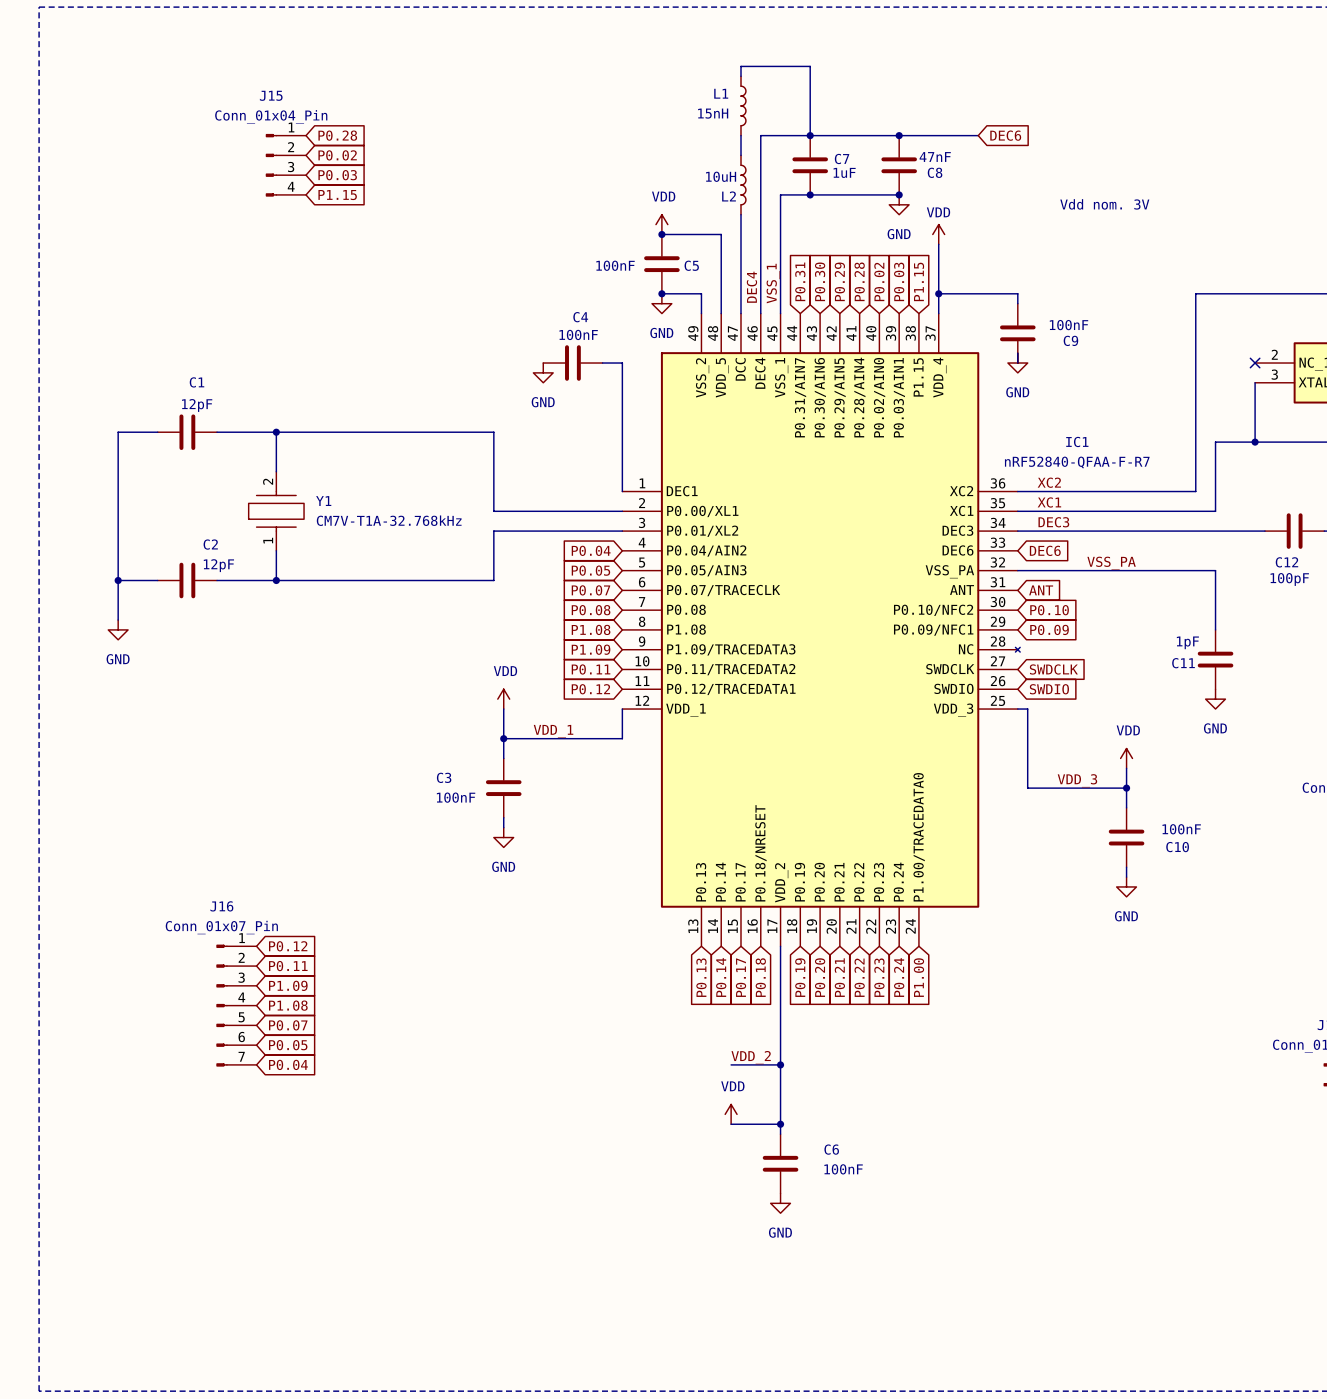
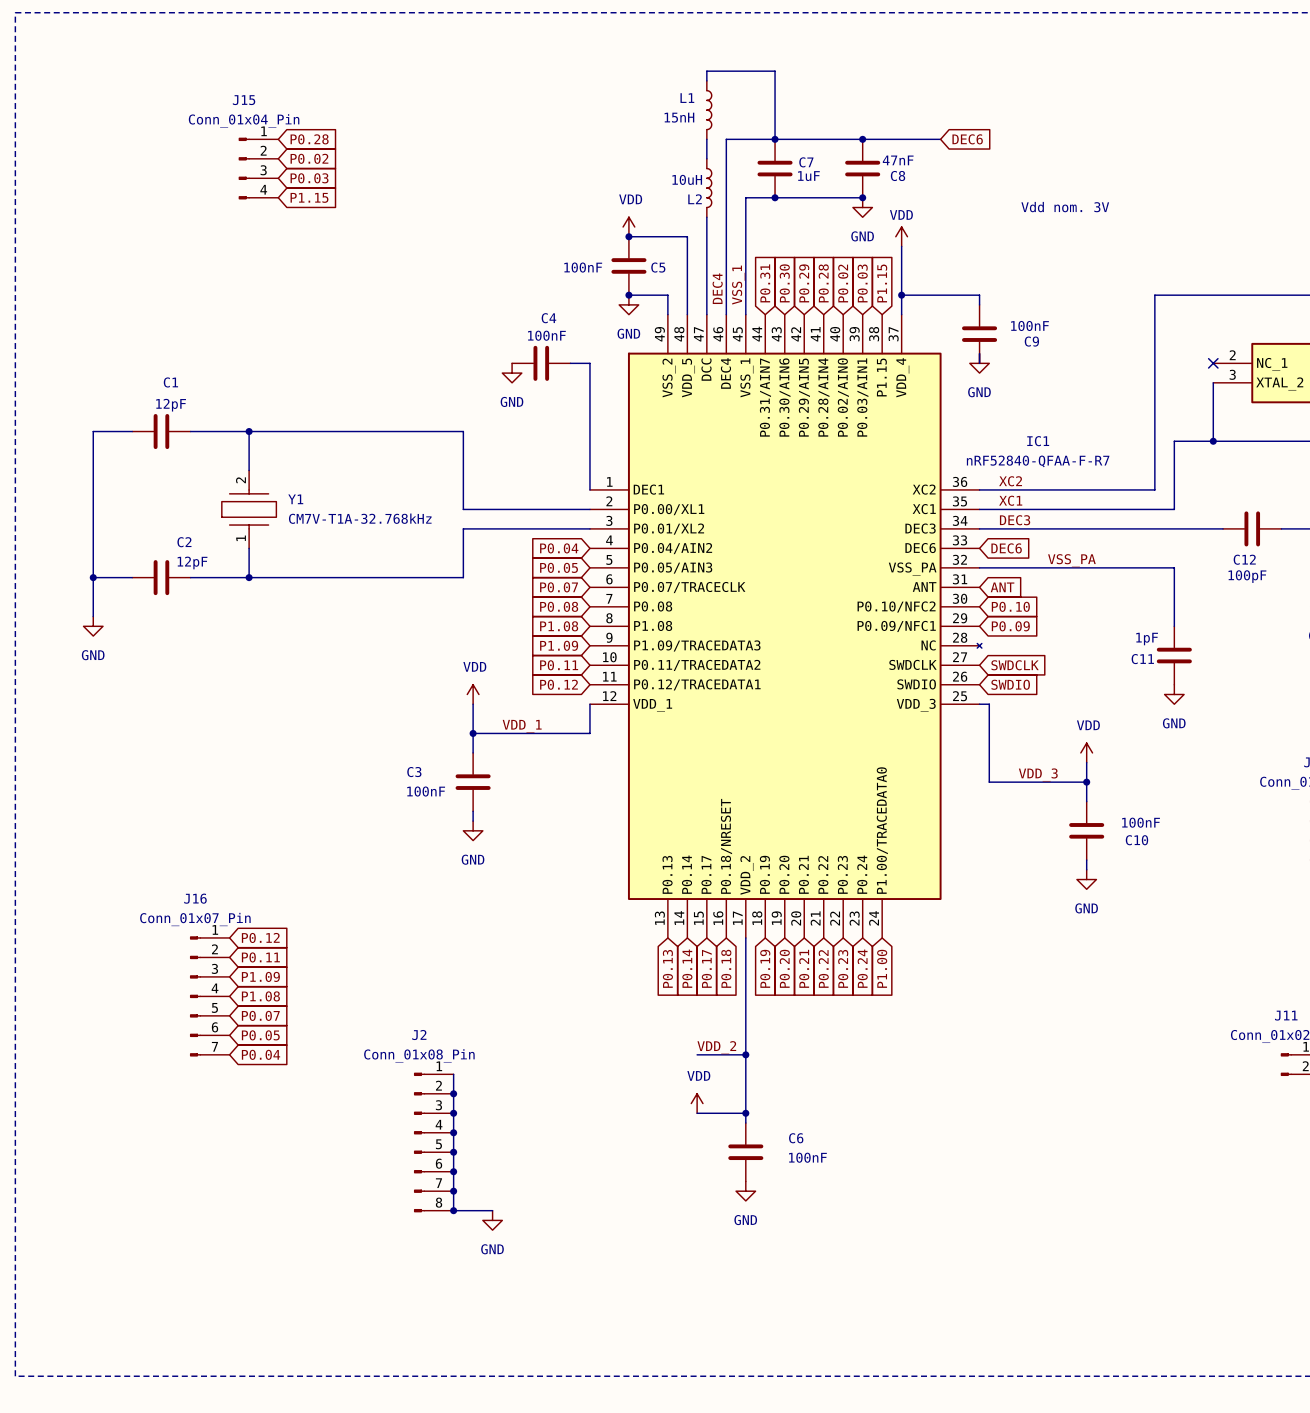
wire: none -> (453, 1074) (453, 1210) (492, 1210)
junction: none -> (453, 1093)
junction: none -> (453, 1113)
junction: none -> (453, 1132)
J2: none -> Conn_01x08_Pin (433, 1142)
junction: none -> (453, 1152)
junction: none -> (453, 1171)
junction: none -> (453, 1191)
junction: none -> (453, 1210)
power symbol: none -> GND (492, 1220)

